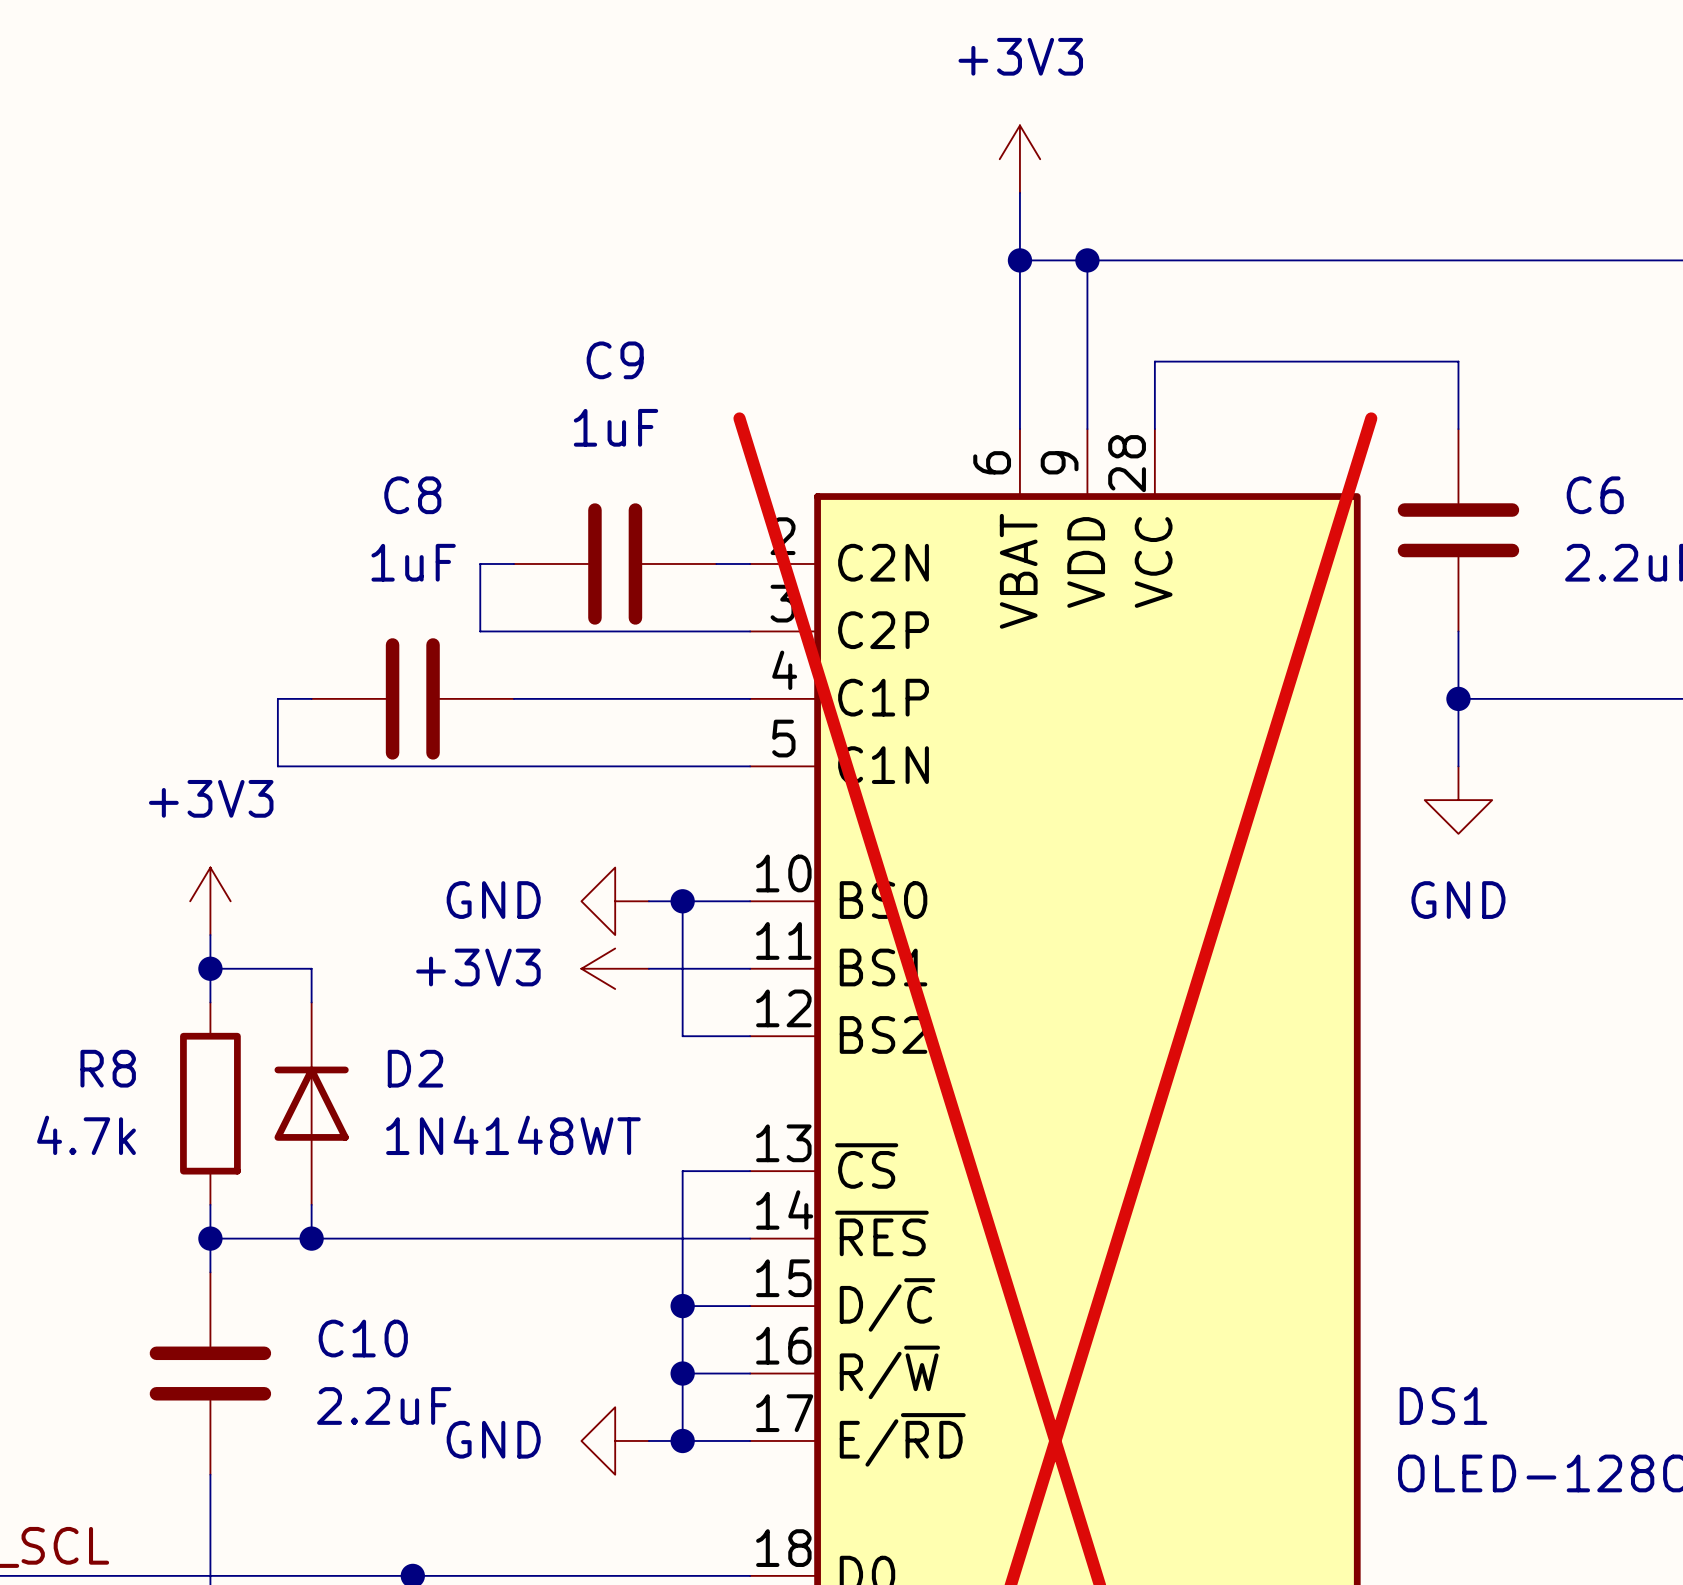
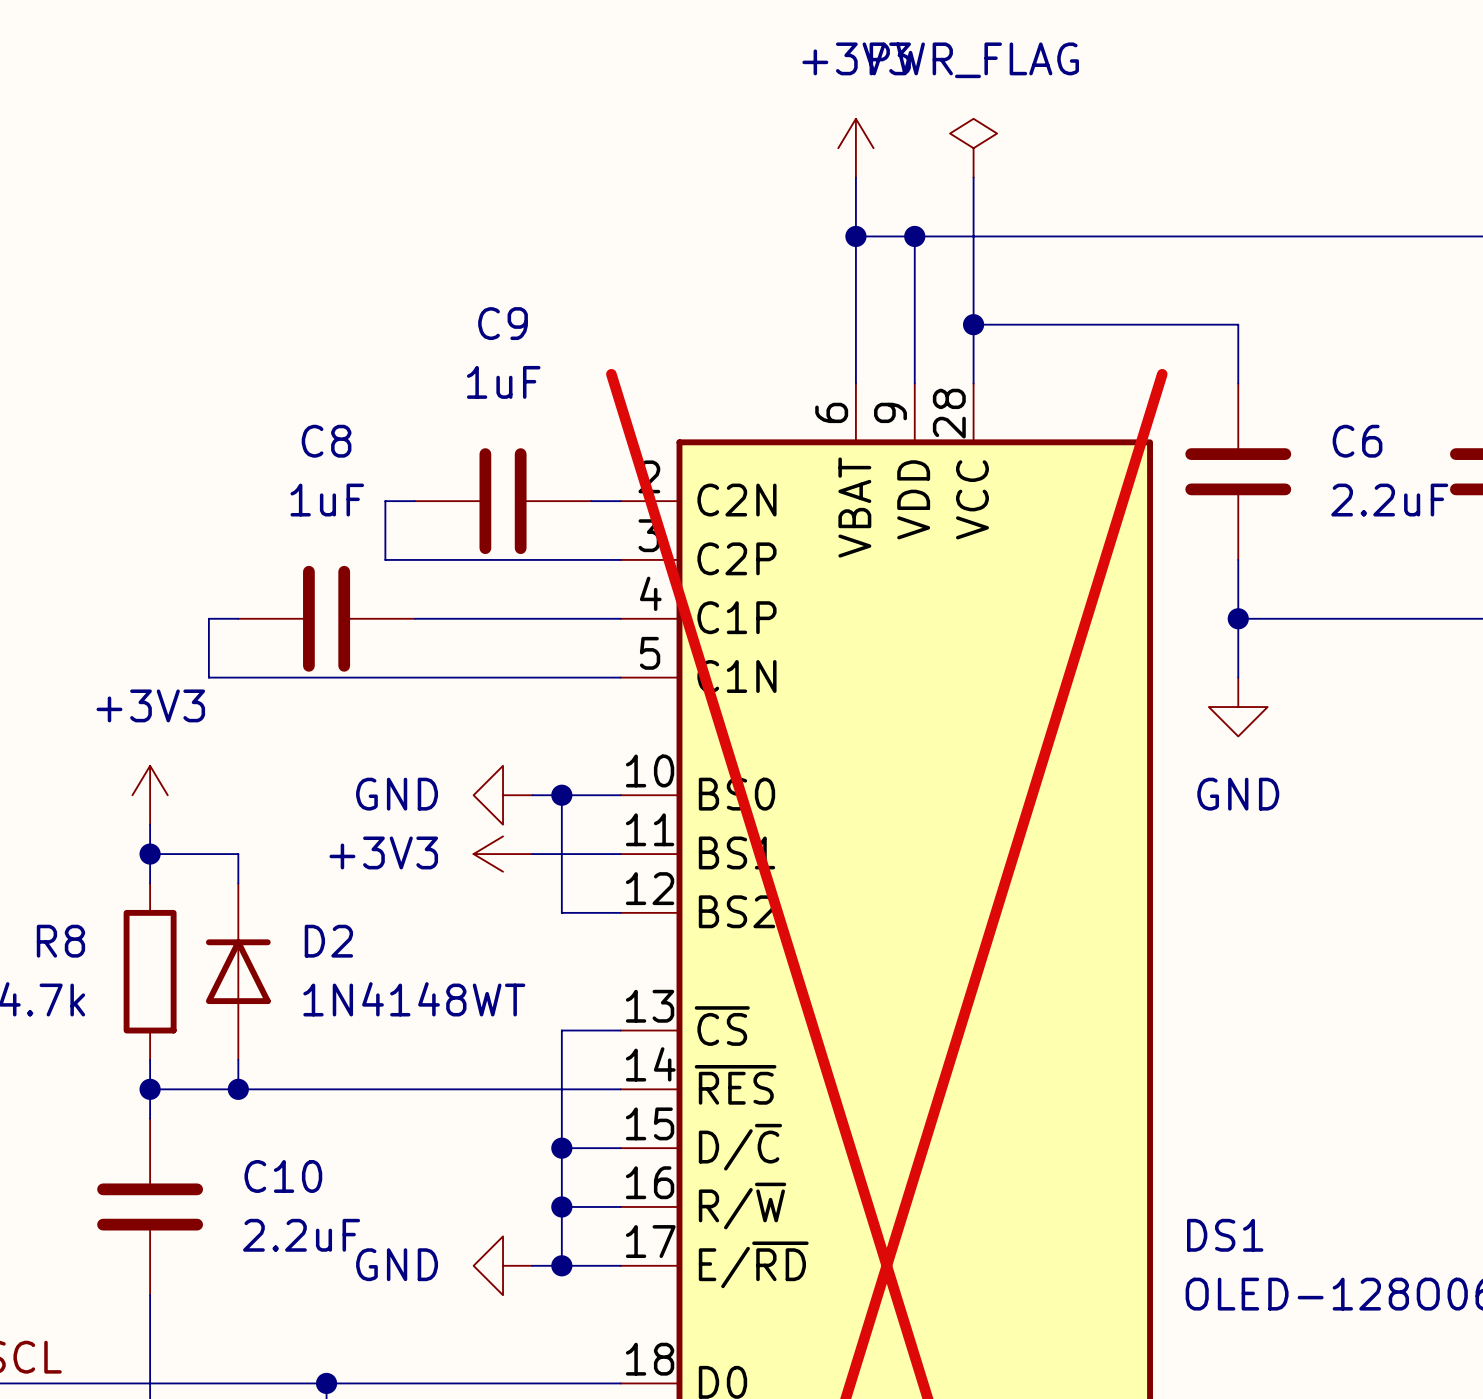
power symbol: none -> PWR_FLAG (973, 148)
wire: none -> (973, 177) (973, 324)
junction: none -> (973, 324)

